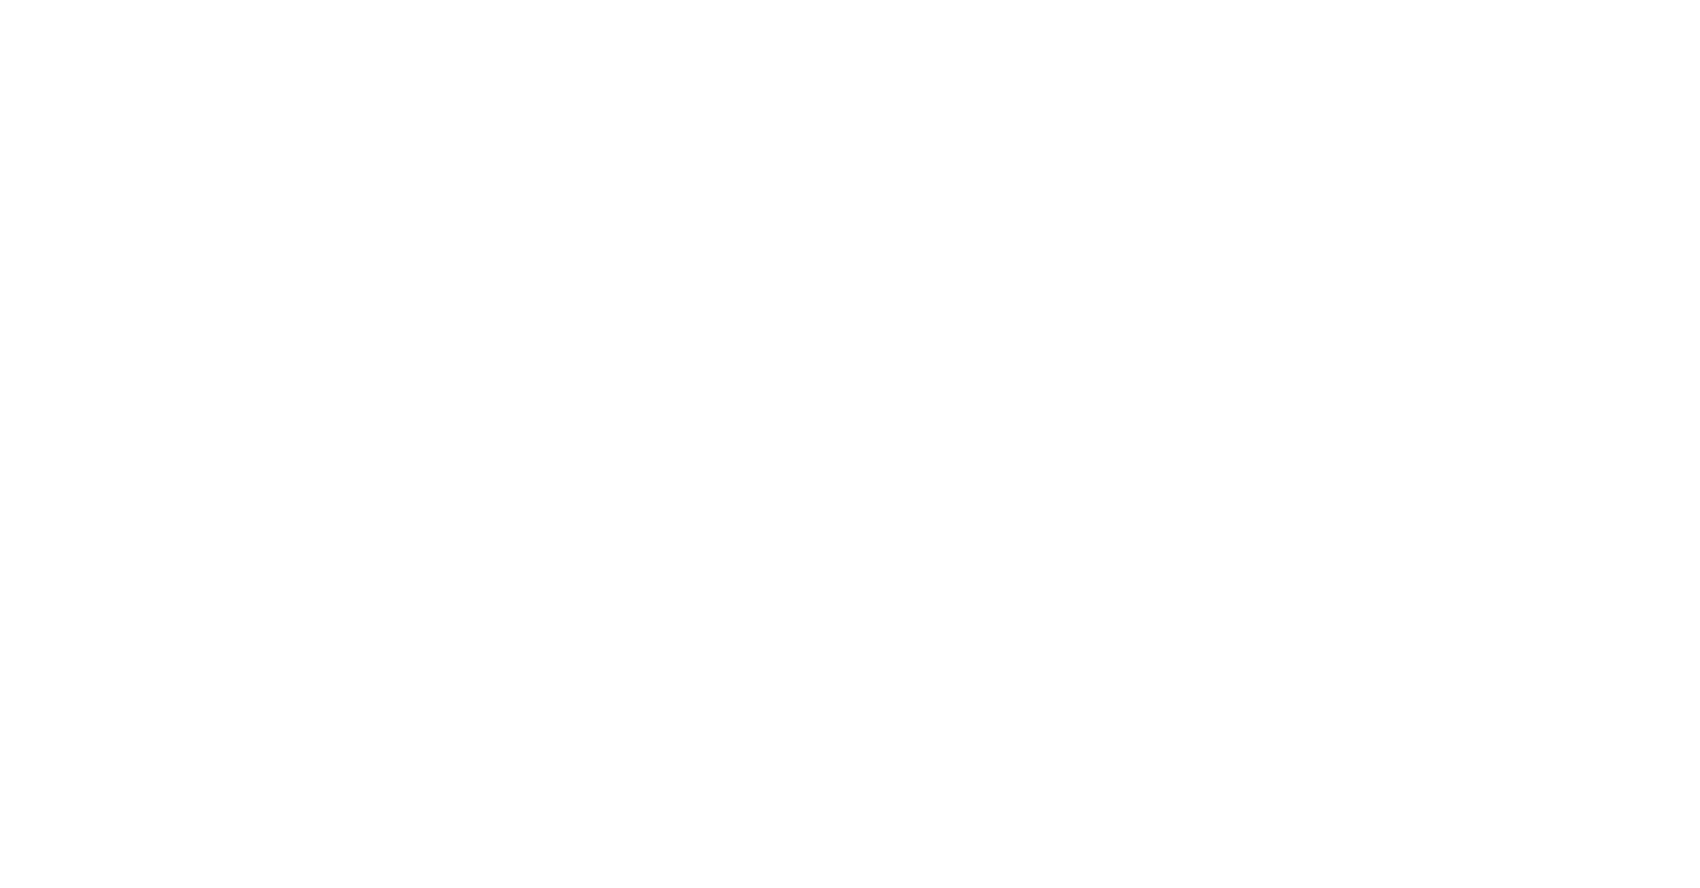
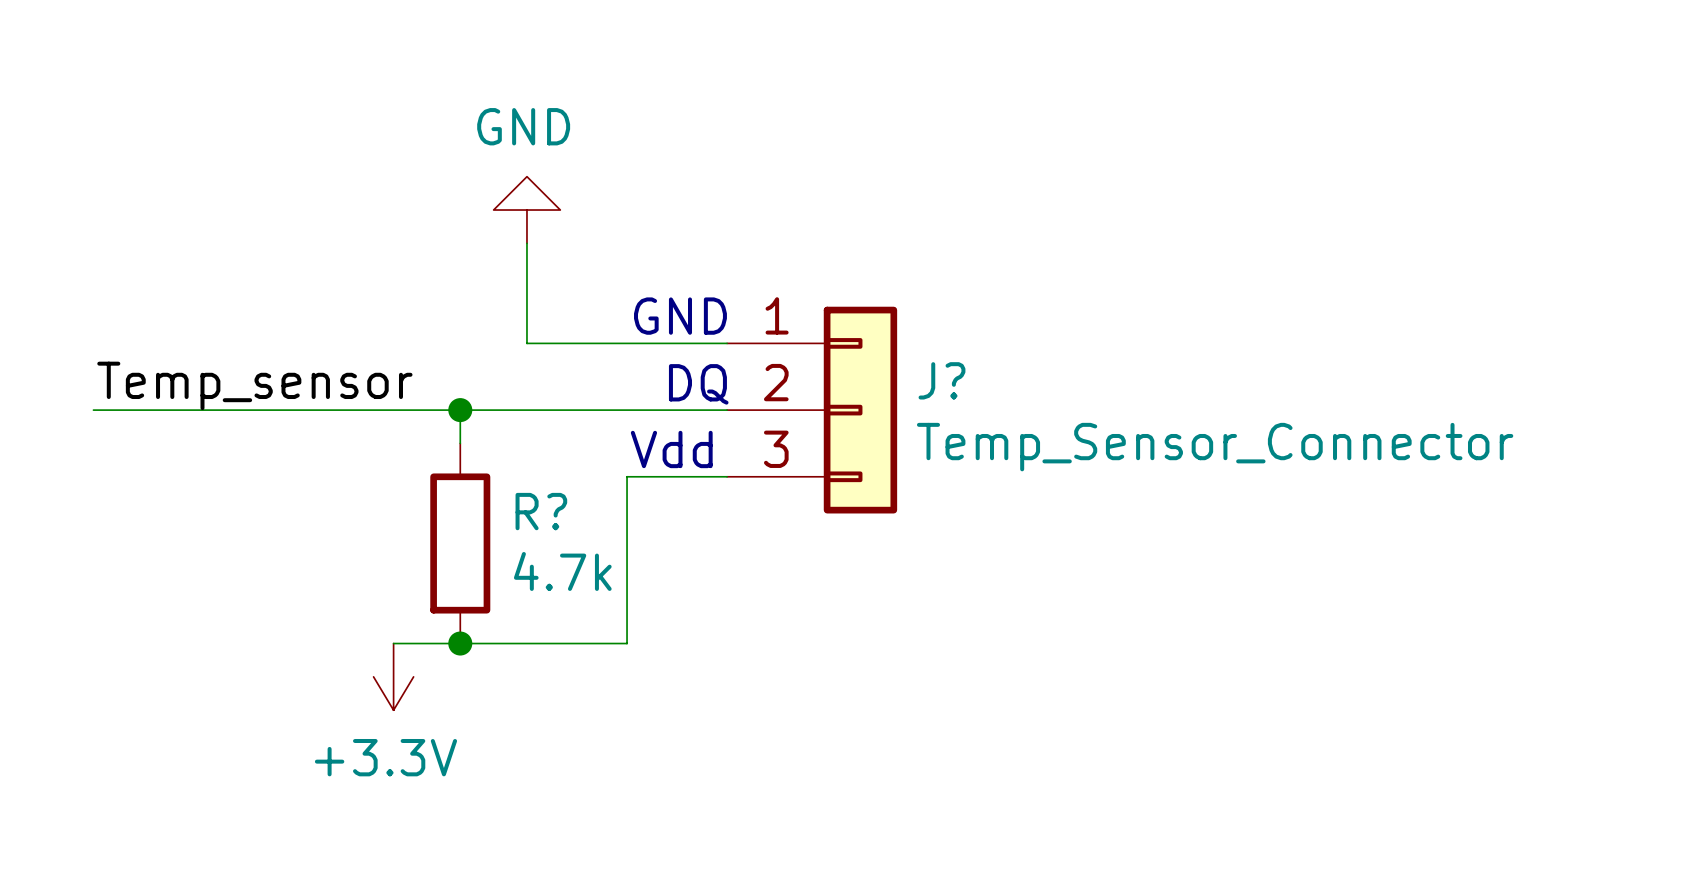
power symbol: none -> GND (526, 210)
wire: none -> (526, 243) (526, 343) (727, 343)
text: none -> GND (680, 316)
text: none -> DQ (698, 384)
label: none -> Temp_sensor (254, 385)
wire: none -> (93, 410) (727, 410)
wire: none -> (460, 410) (460, 443)
junction: none -> (460, 410)
J?: none -> Temp_Sensor_Connector (812, 410)
text: none -> Vdd (671, 449)
wire: none -> (727, 476) (627, 476) (627, 643) (393, 643)
R?: none -> 4.7k (460, 543)
junction: none -> (460, 643)
power symbol: none -> +3.3V (393, 676)

